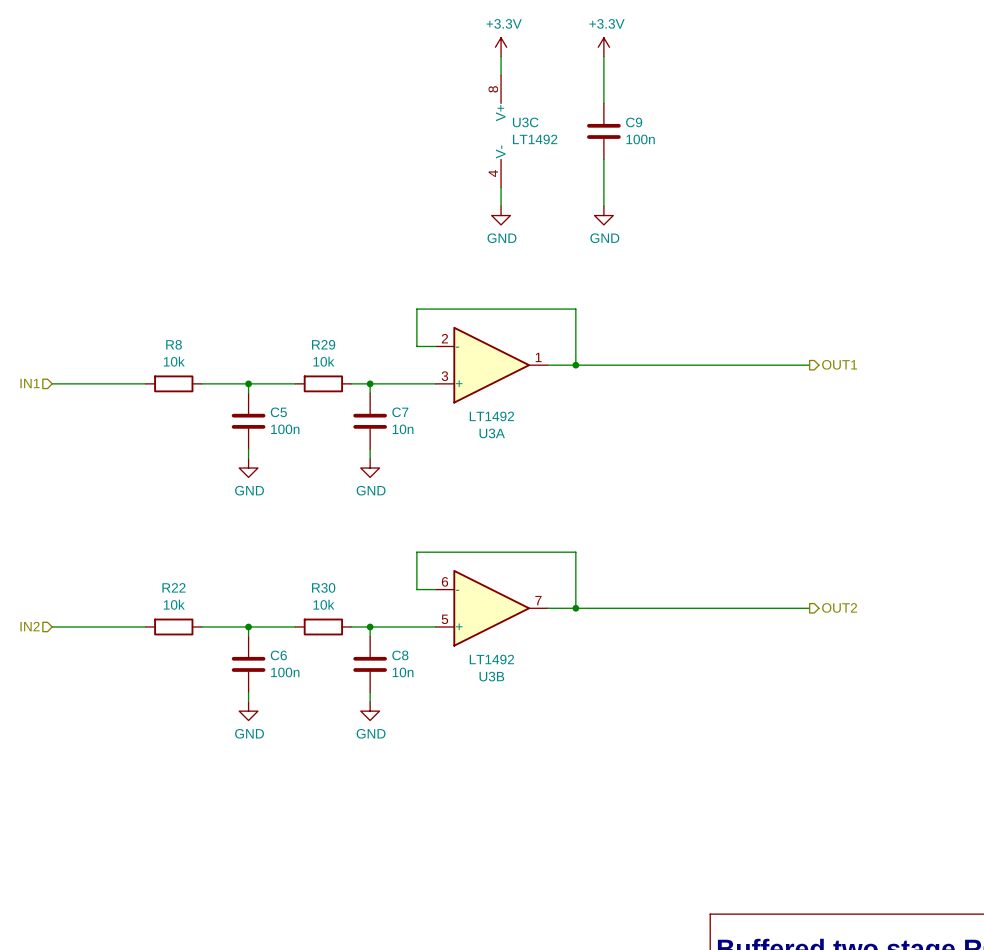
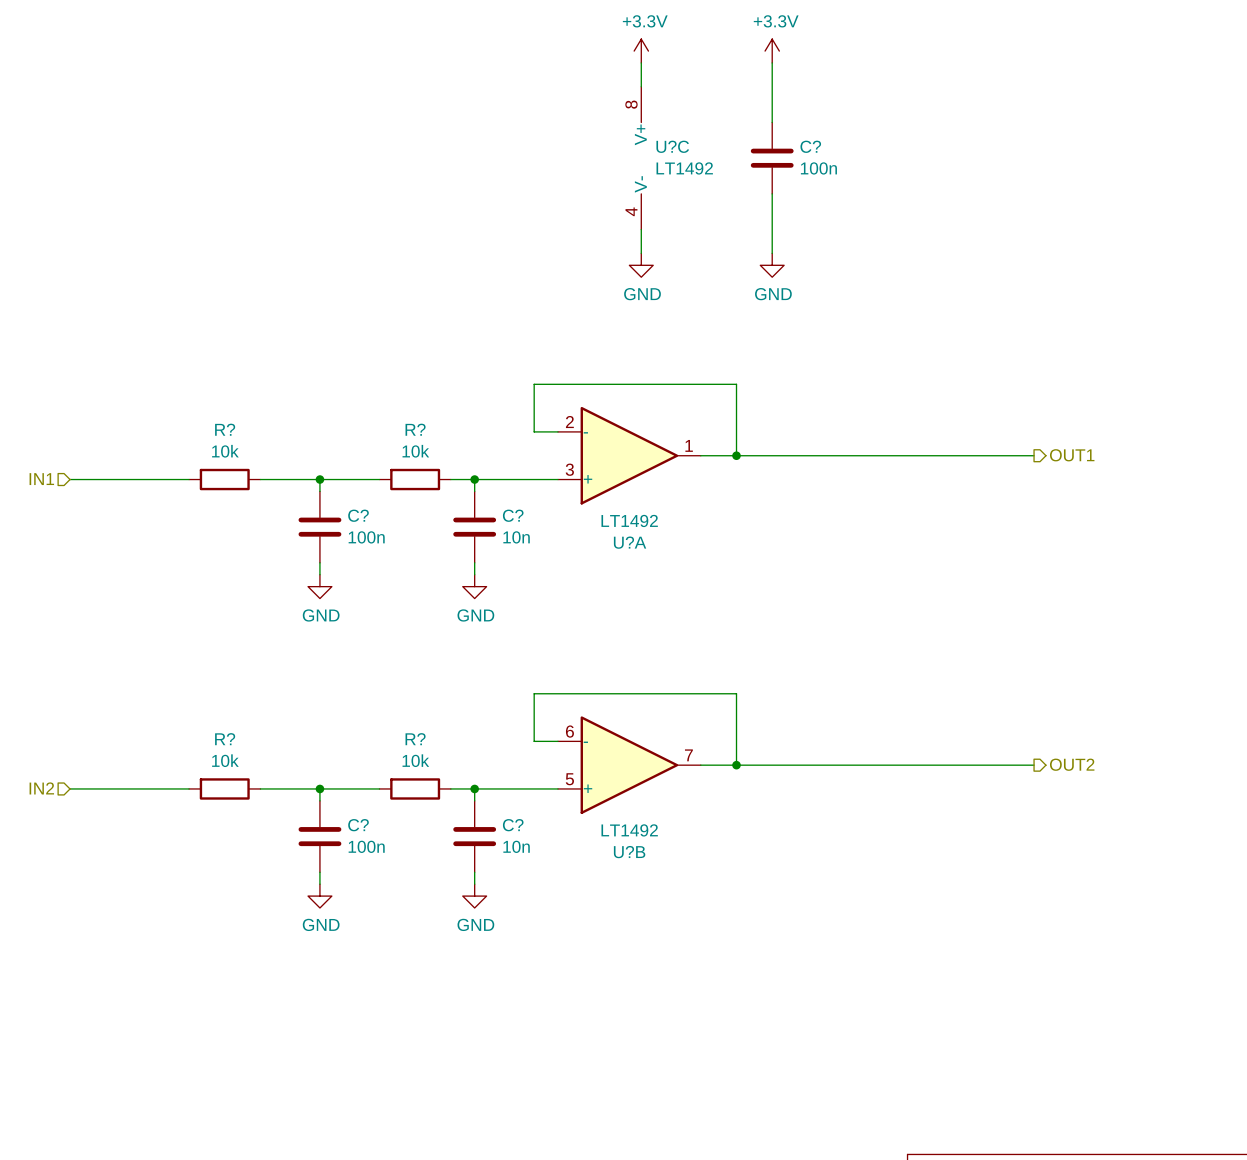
U3C name: U3C (525, 122) -> U?C (672, 146)
C9 name: C9 (634, 122) -> C? (810, 146)
R8 name: R8 (174, 344) -> R? (225, 429)
R29 name: R29 (323, 344) -> R? (415, 429)
C5 name: C5 (278, 412) -> C? (358, 515)
C7 name: C7 (400, 412) -> C? (513, 515)
U3A name: U3A (492, 433) -> U?A (630, 542)
R22 name: R22 (173, 587) -> R? (225, 739)
R30 name: R30 (323, 587) -> R? (415, 739)
C6 name: C6 (278, 655) -> C? (358, 825)
C8 name: C8 (400, 655) -> C? (513, 825)
U3B name: U3B (491, 676) -> U?B (629, 852)

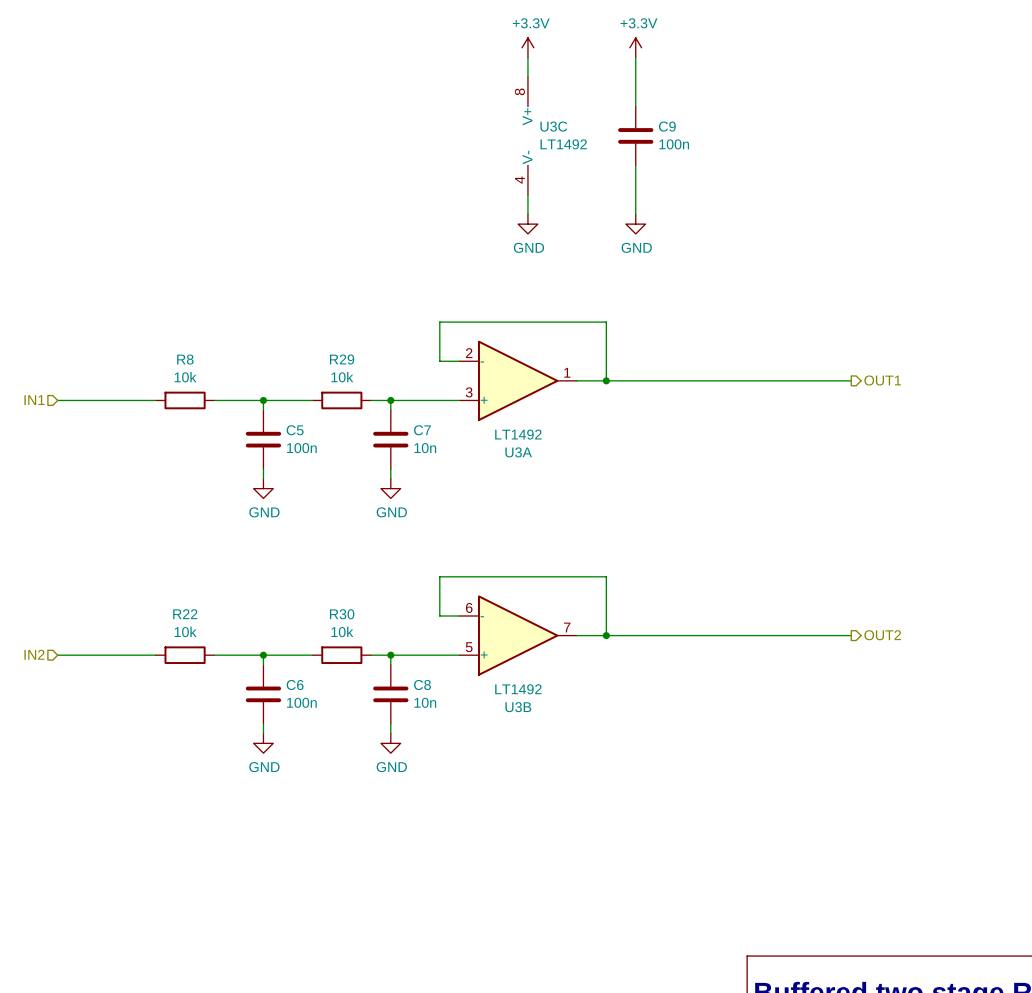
U?C name: U?C (672, 146) -> U3C (553, 126)
C? name: C? (810, 146) -> C9 (667, 126)
R? name: R? (225, 429) -> R8 (185, 359)
R? name: R? (415, 429) -> R29 (342, 359)
C? name: C? (358, 515) -> C5 (295, 430)
C? name: C? (513, 515) -> C7 (422, 430)
U?A name: U?A (630, 542) -> U3A (518, 452)
R? name: R? (225, 739) -> R22 (185, 614)
R? name: R? (415, 739) -> R30 (342, 614)
C? name: C? (358, 825) -> C6 (295, 684)
C? name: C? (513, 825) -> C8 (422, 684)
U?B name: U?B (629, 852) -> U3B (518, 707)

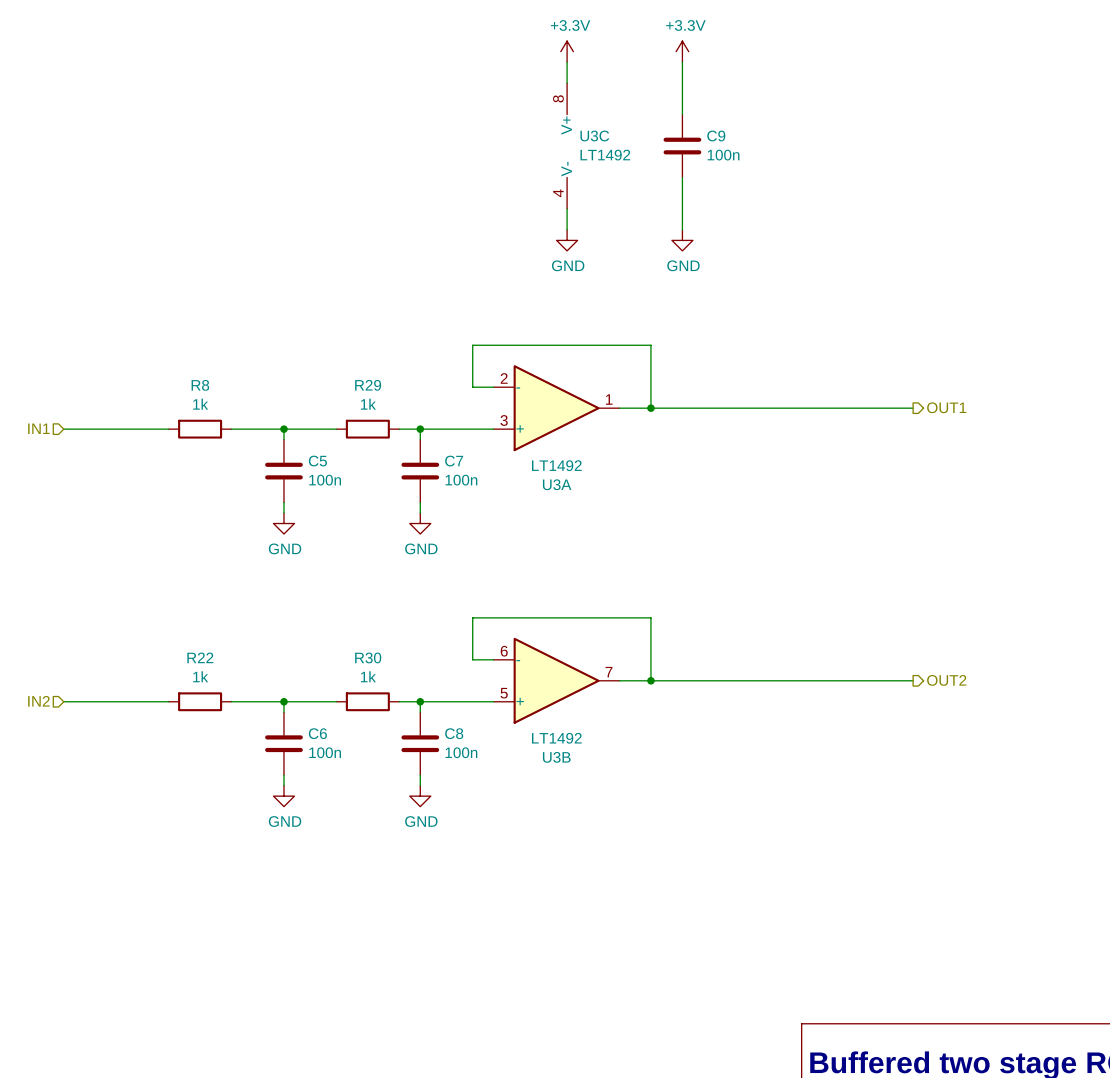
R8 value: 10k (185, 377) -> 1k (200, 404)
R29 value: 10k (342, 377) -> 1k (368, 404)
C7 value: 10n (425, 448) -> 100n (461, 480)
R22 value: 10k (185, 631) -> 1k (200, 676)
R30 value: 10k (342, 631) -> 1k (368, 676)
C8 value: 10n (425, 702) -> 100n (461, 752)

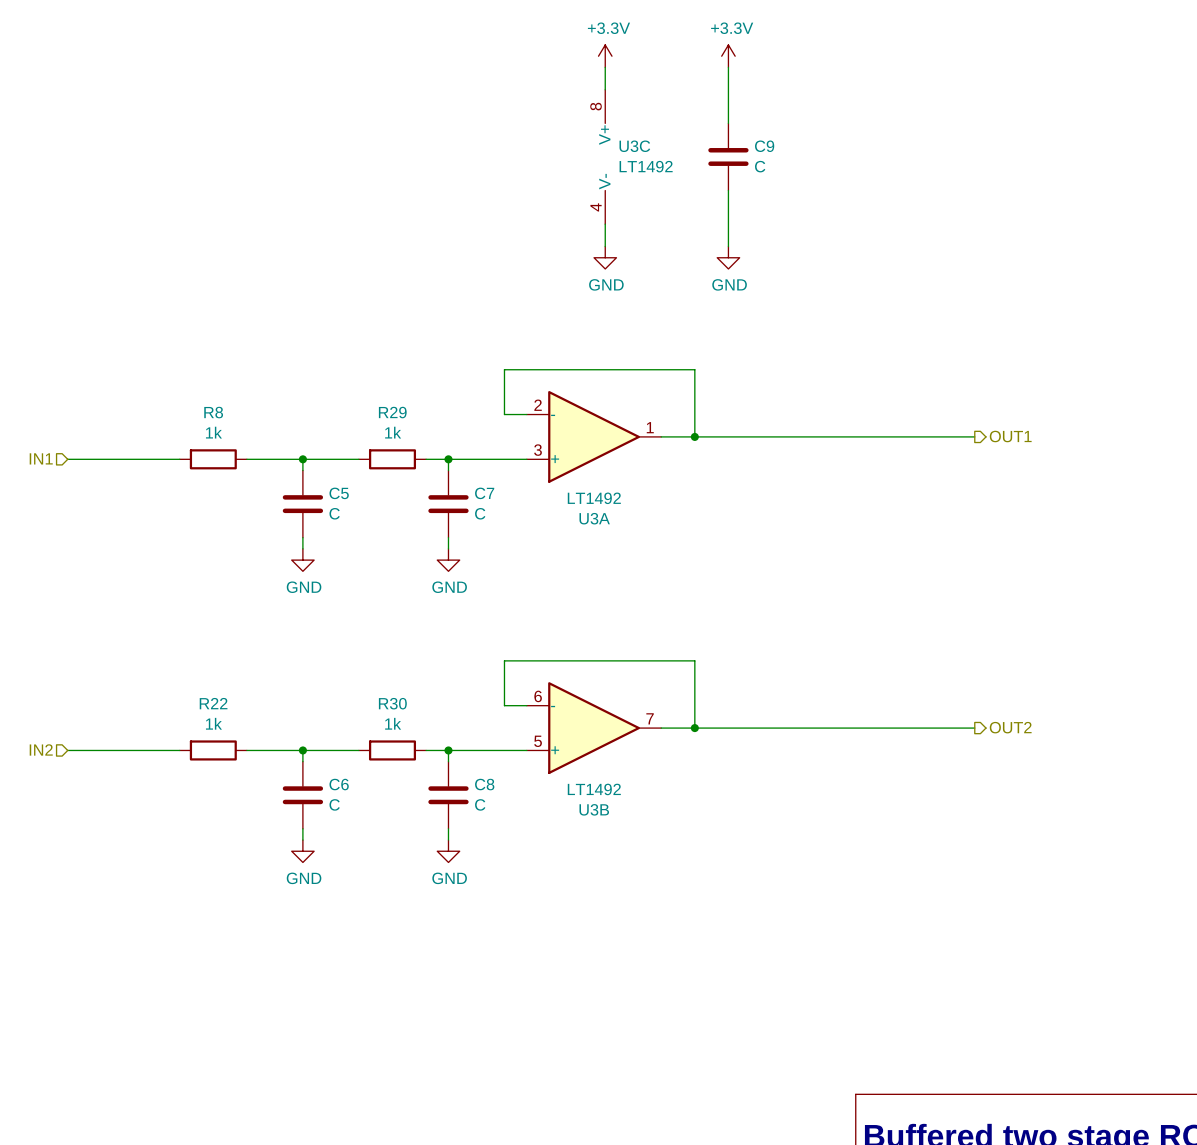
C9 value: 100n (723, 155) -> C (760, 166)
C5 value: 100n (325, 480) -> C (334, 513)
C7 value: 100n (461, 480) -> C (480, 513)
C6 value: 100n (325, 752) -> C (334, 804)
C8 value: 100n (461, 752) -> C (480, 804)

